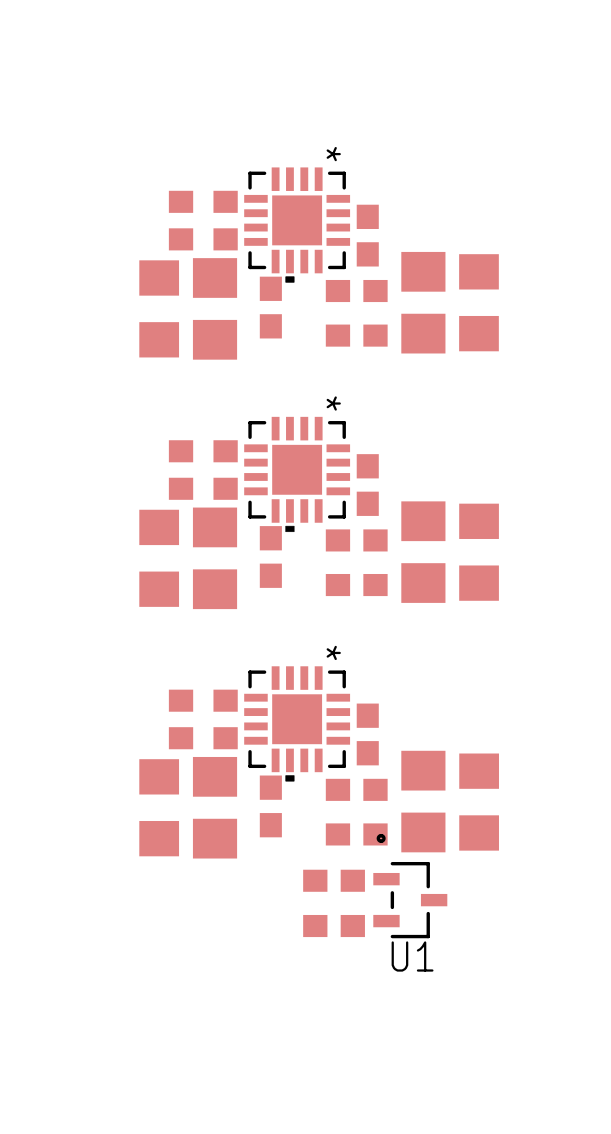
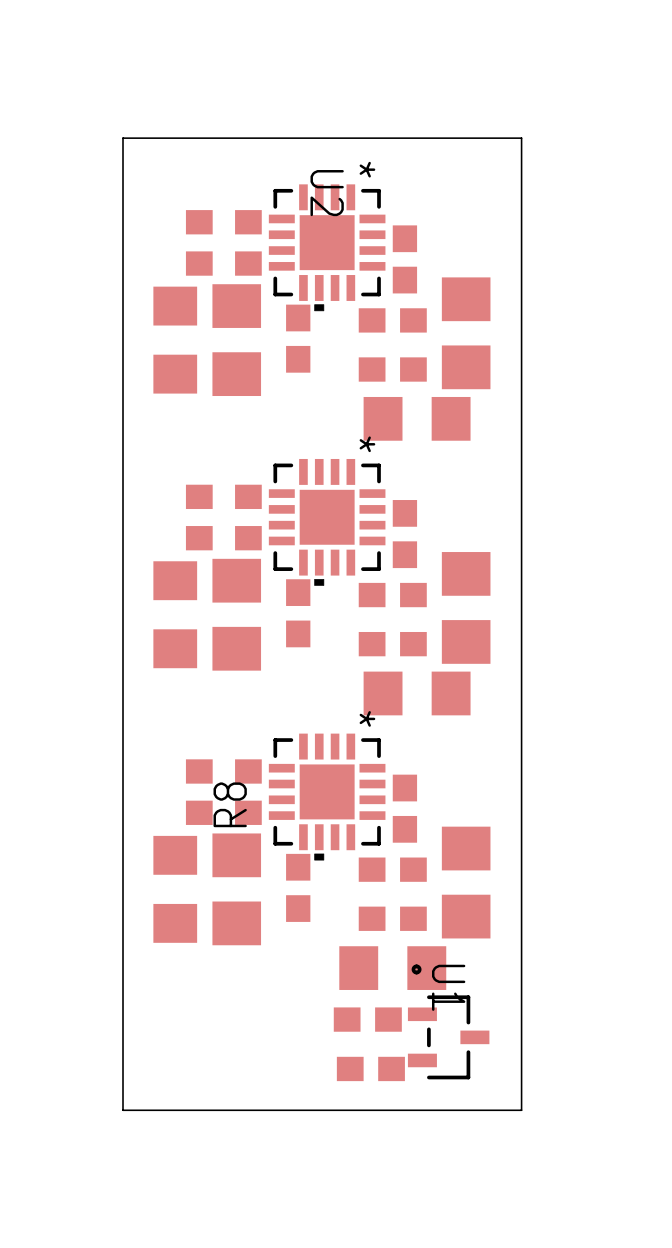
board edge: none -> (123, 138) (521, 138) (521, 1110) (123, 1110) (123, 138)
U2 name: none -> U2 (327, 193)
part: (478, 302) -> none
part: none -> (417, 418)
part: (479, 552) -> none
part: none -> (417, 693)
R8 name: none -> R8 (230, 804)
part: (479, 802) -> none
part: none -> (392, 968)
part position: (334, 880) -> (370, 1068)
U1 position: (410, 886) -> (448, 1021)
U1 name rotation: 0° (412, 956) -> 90° clockwise (448, 987)

